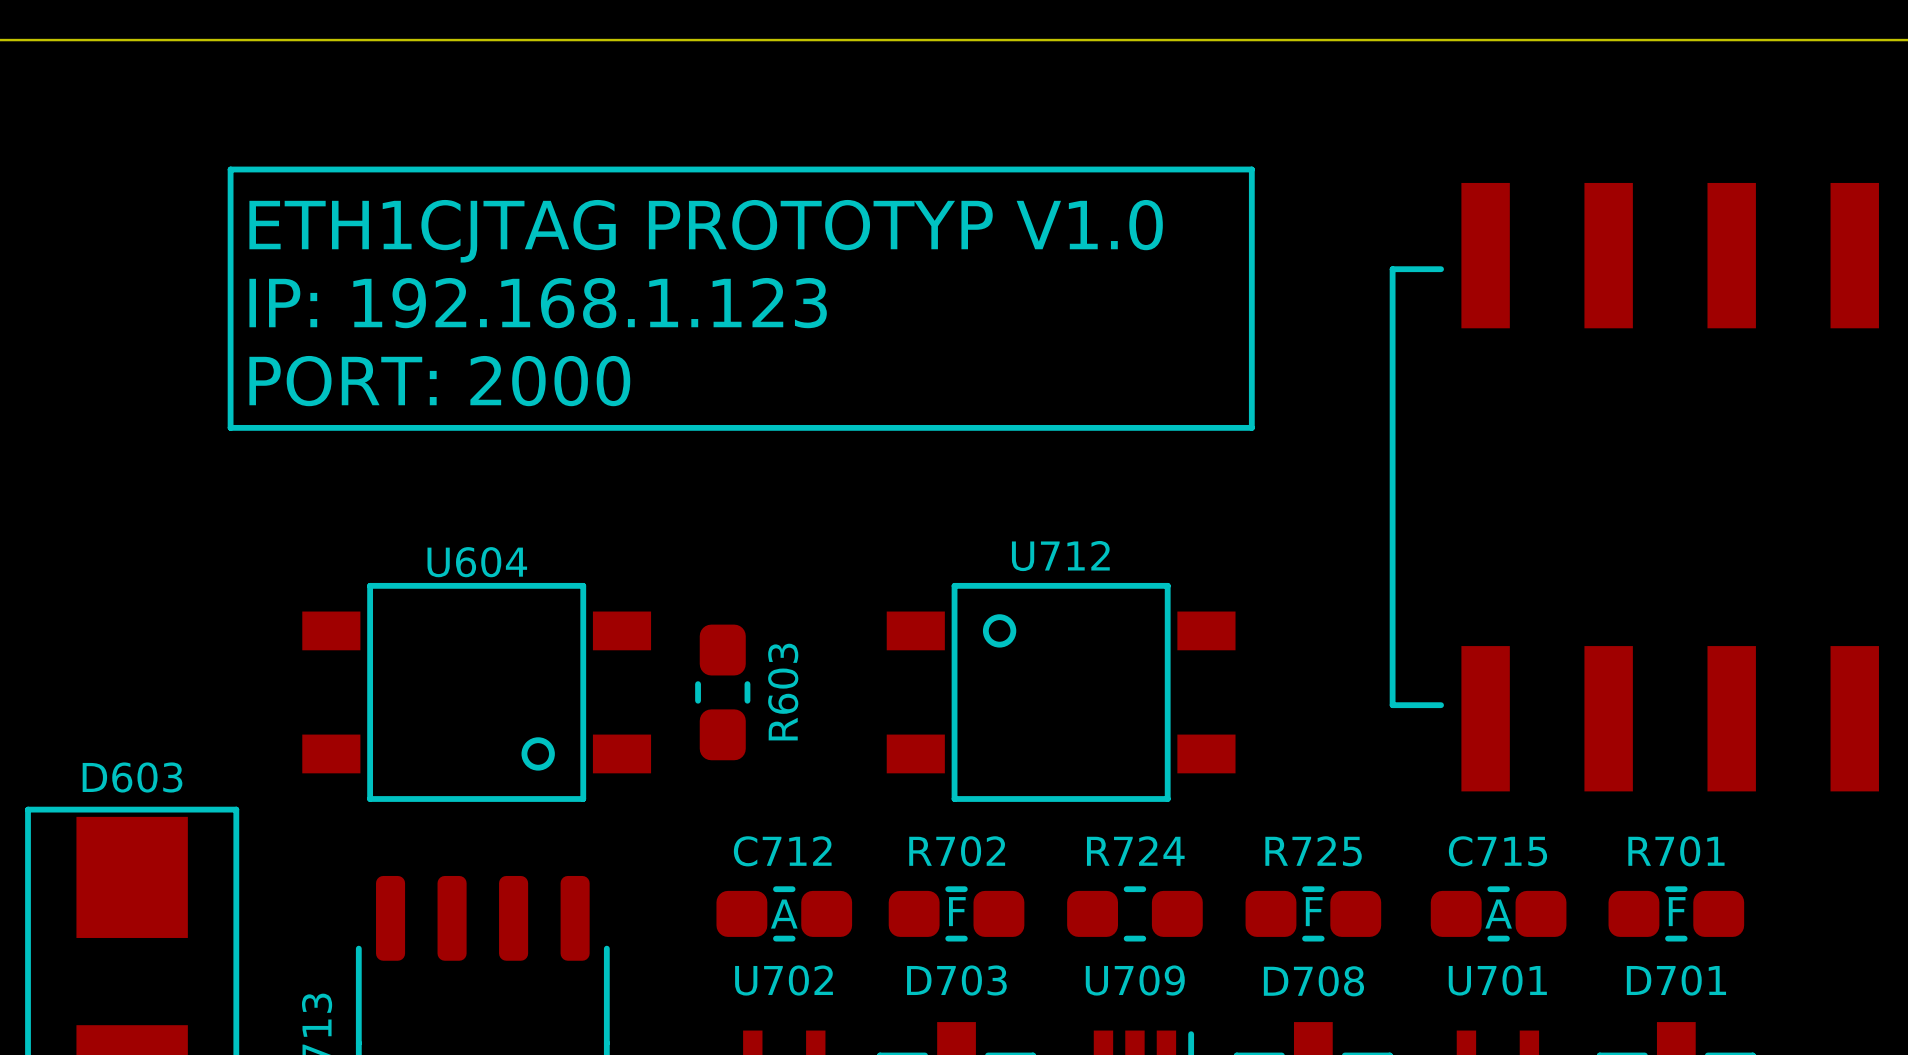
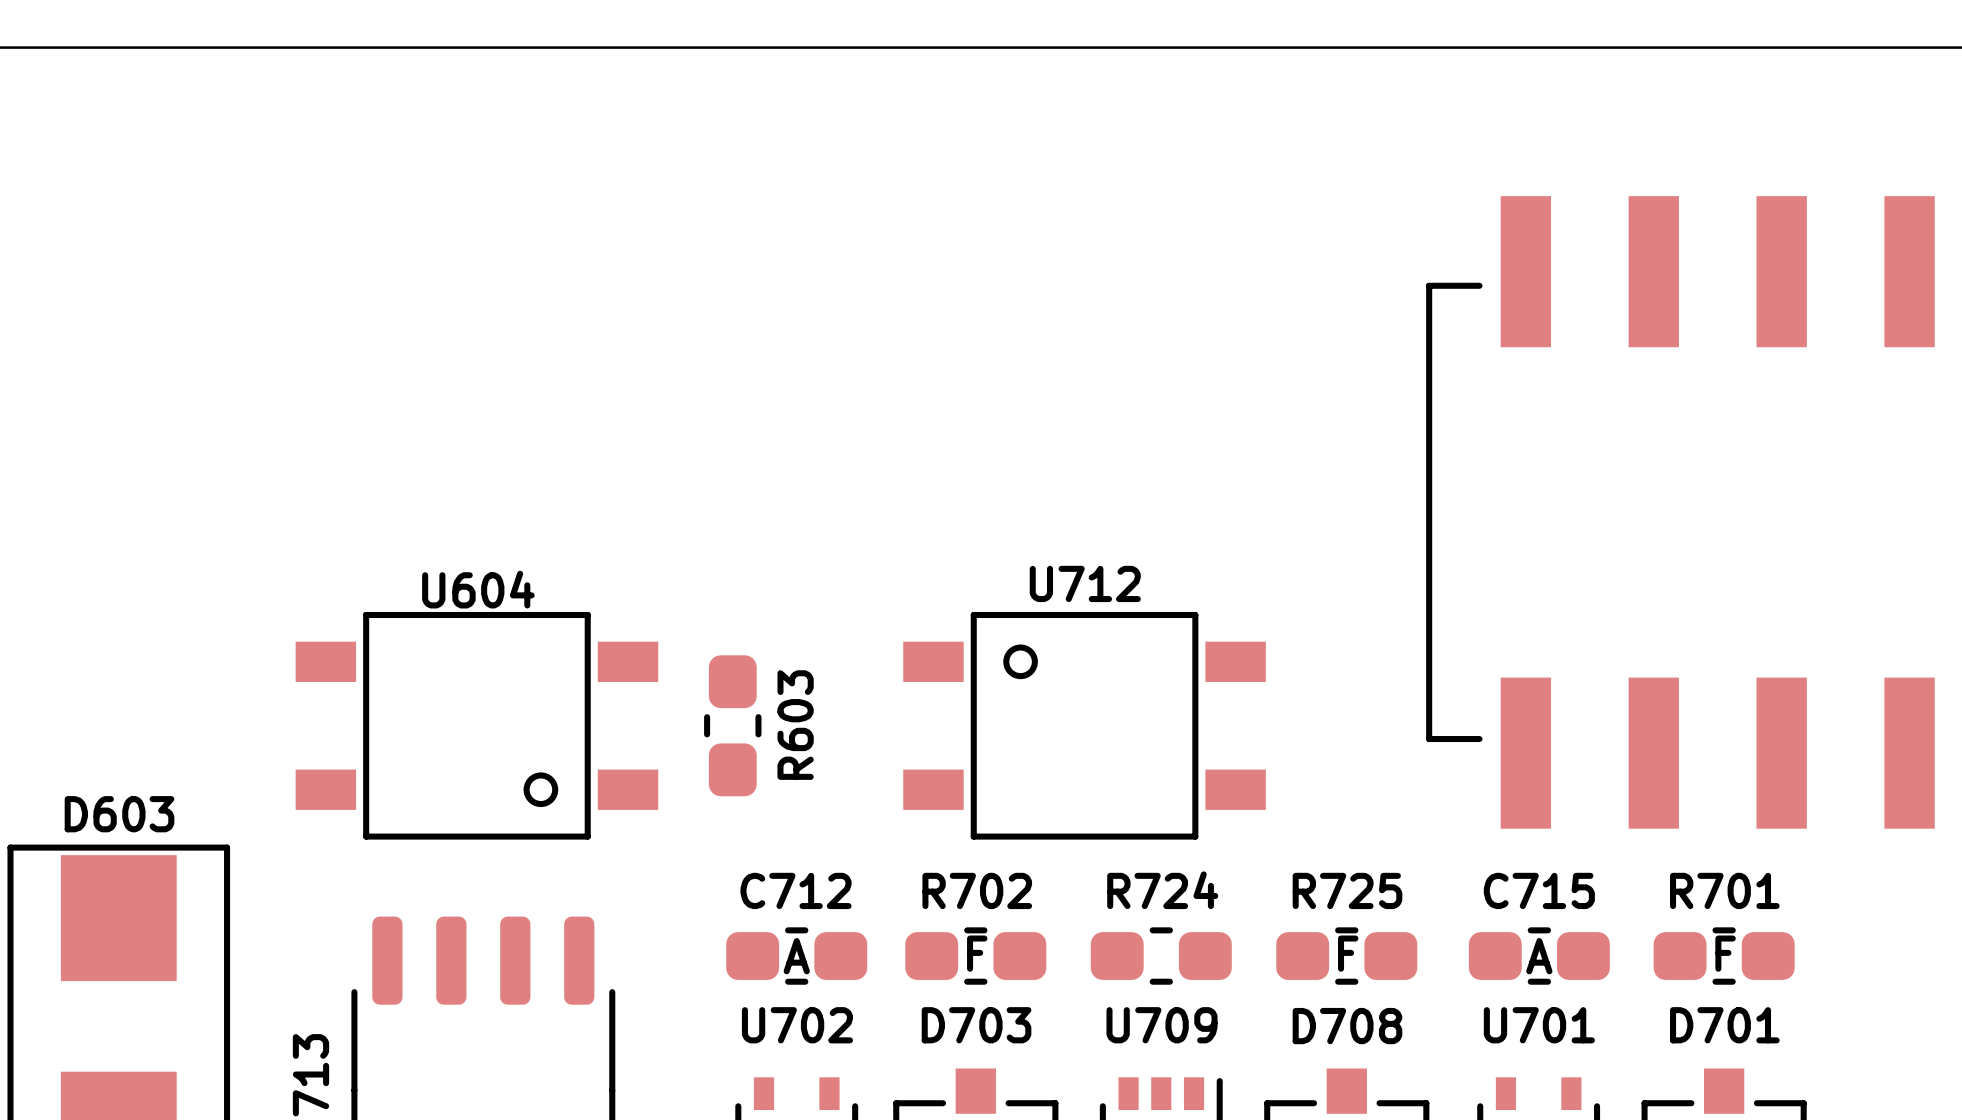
line: (230, 169) (230, 427) (1251, 427) (1251, 169) (230, 169) -> none
text: ETH1CJTAG PROTOTYP V1.0 (706, 231) -> none
text: IP: 192.168.1.123 (538, 303) -> none
text: PORT: 2000 (439, 381) -> none

